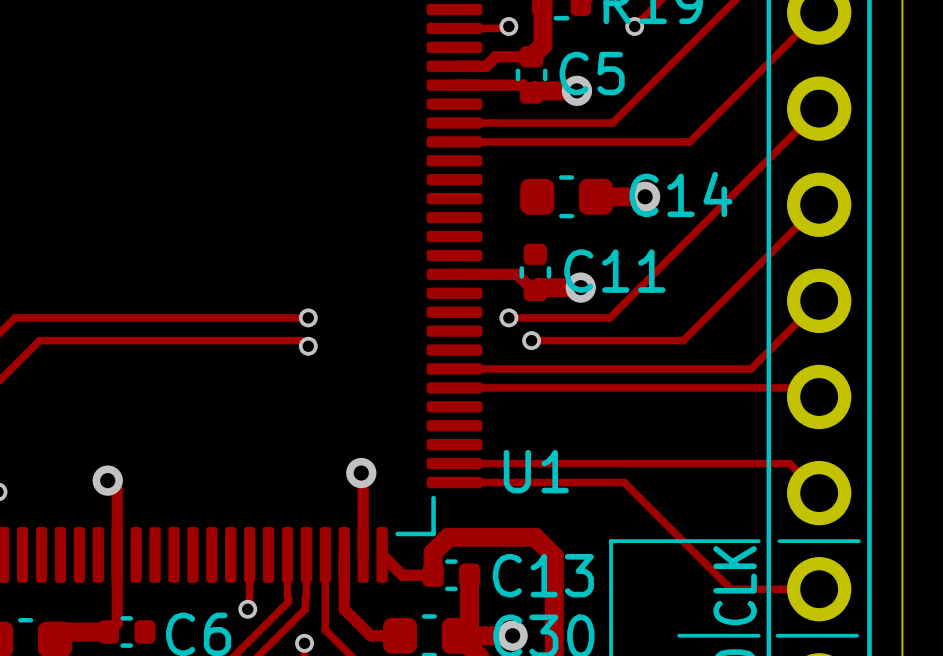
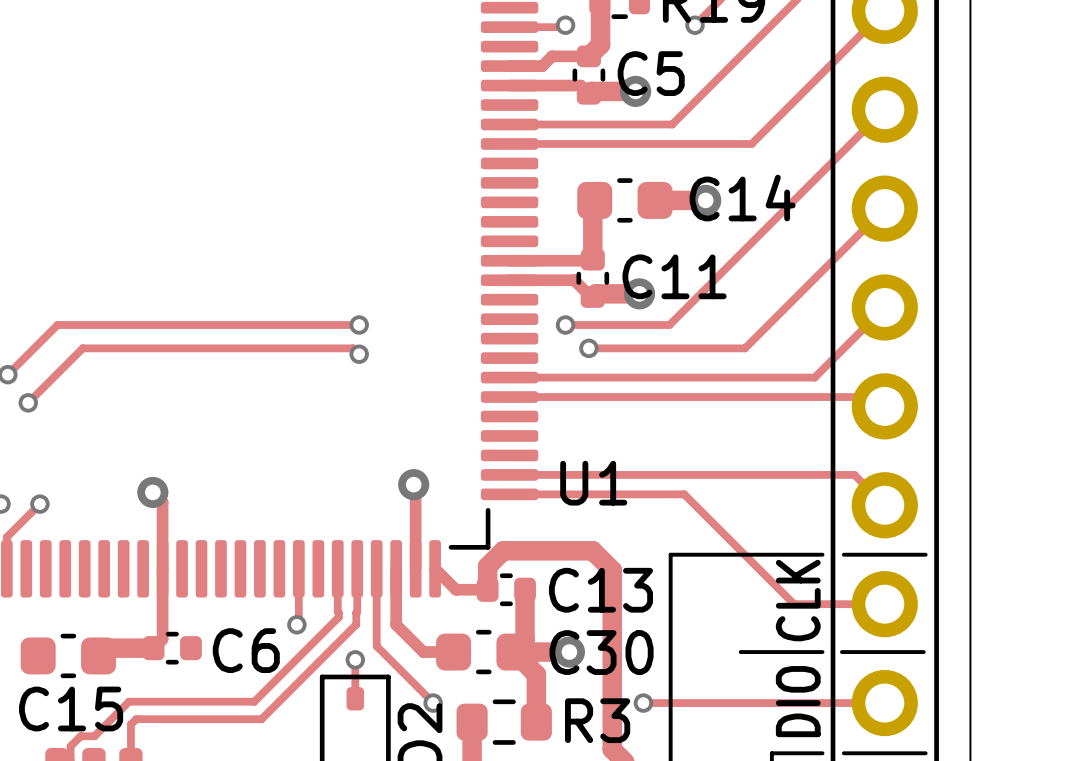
track: none -> (592, 202) (592, 259)
track: none -> (509, 260) (591, 260)

